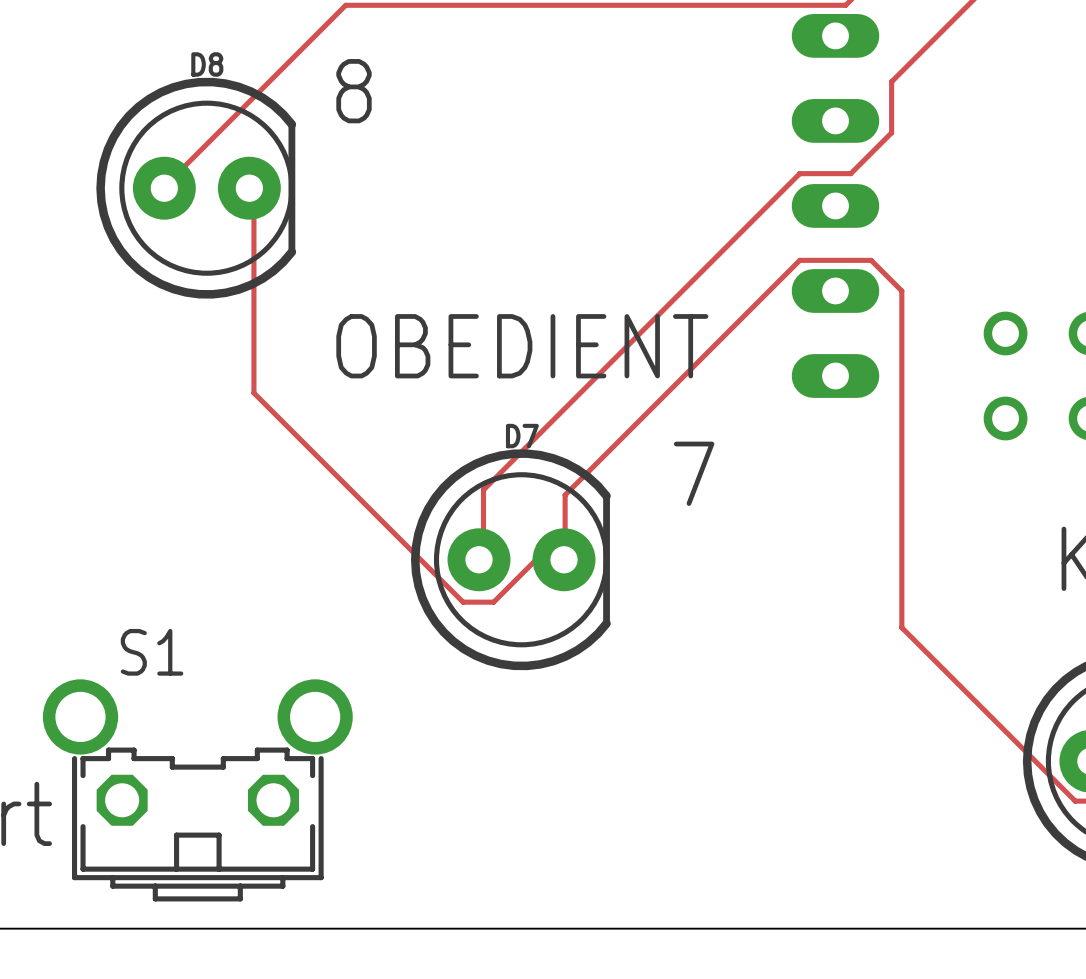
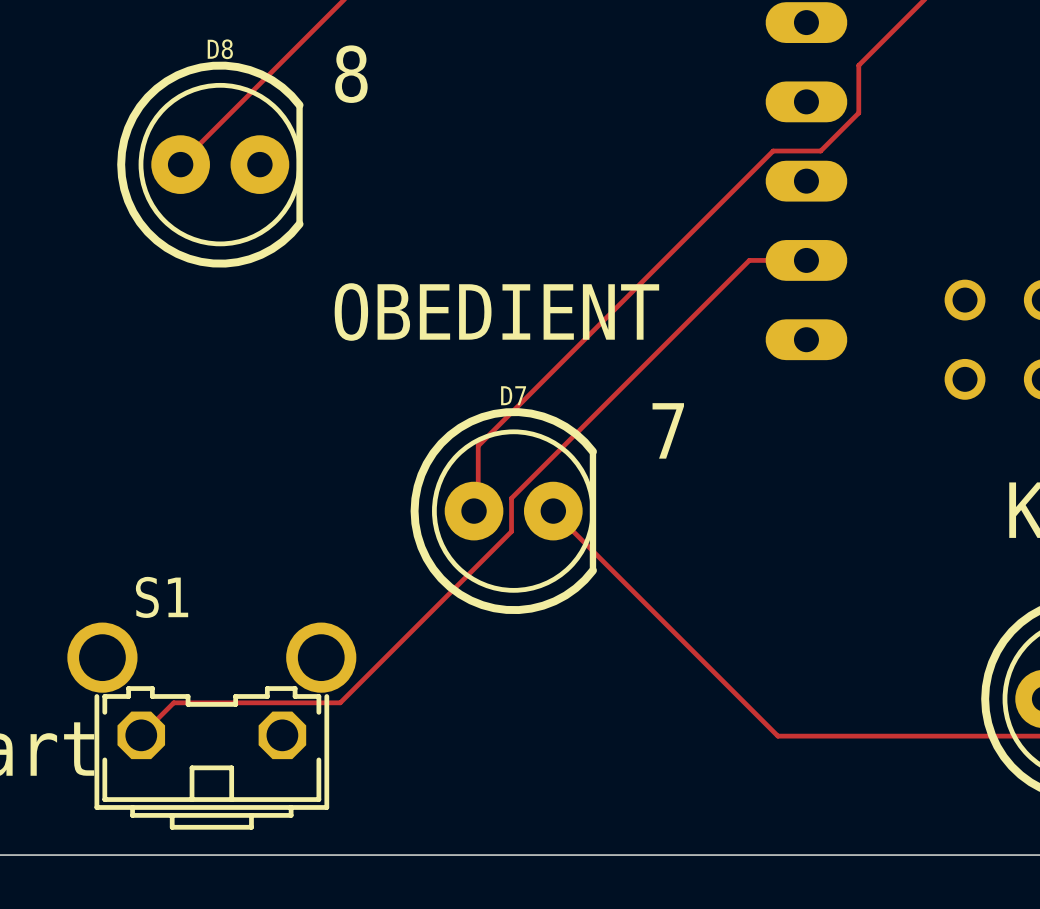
track: (249, 188) (253, 188) (253, 393) (463, 602) (493, 602) (534, 561) (564, 559) (565, 495) (799, 260) (871, 260) (901, 290) (901, 627) (1075, 801) -> (553, 511) (777, 736) (1030, 736)
track: none -> (806, 260) (749, 260) (511, 498) (511, 531) (340, 702) (173, 702) (141, 735)

